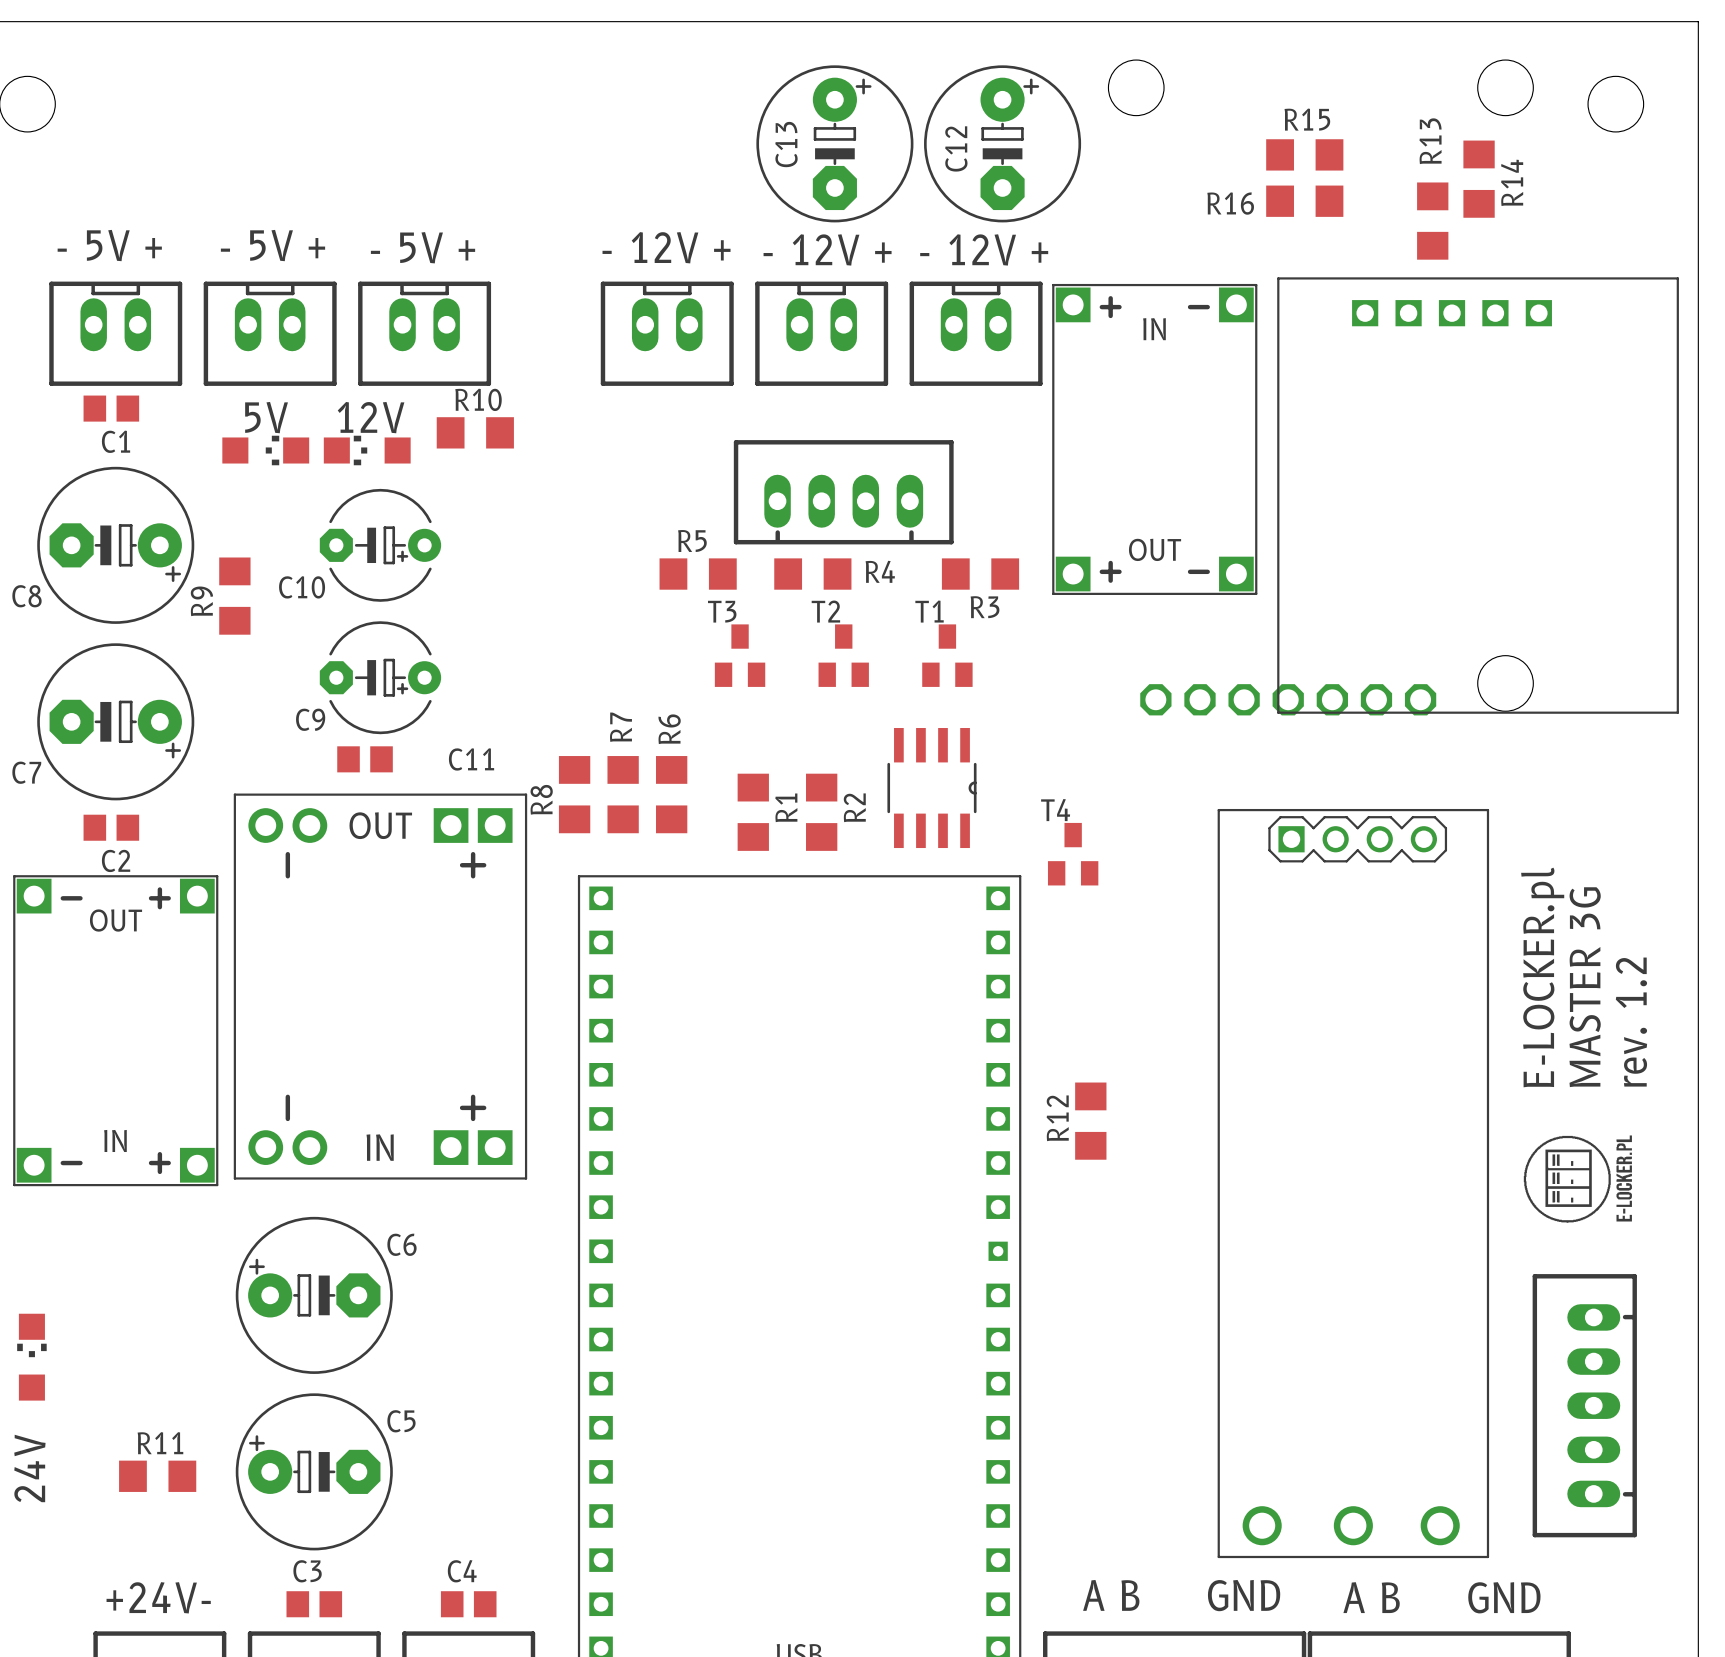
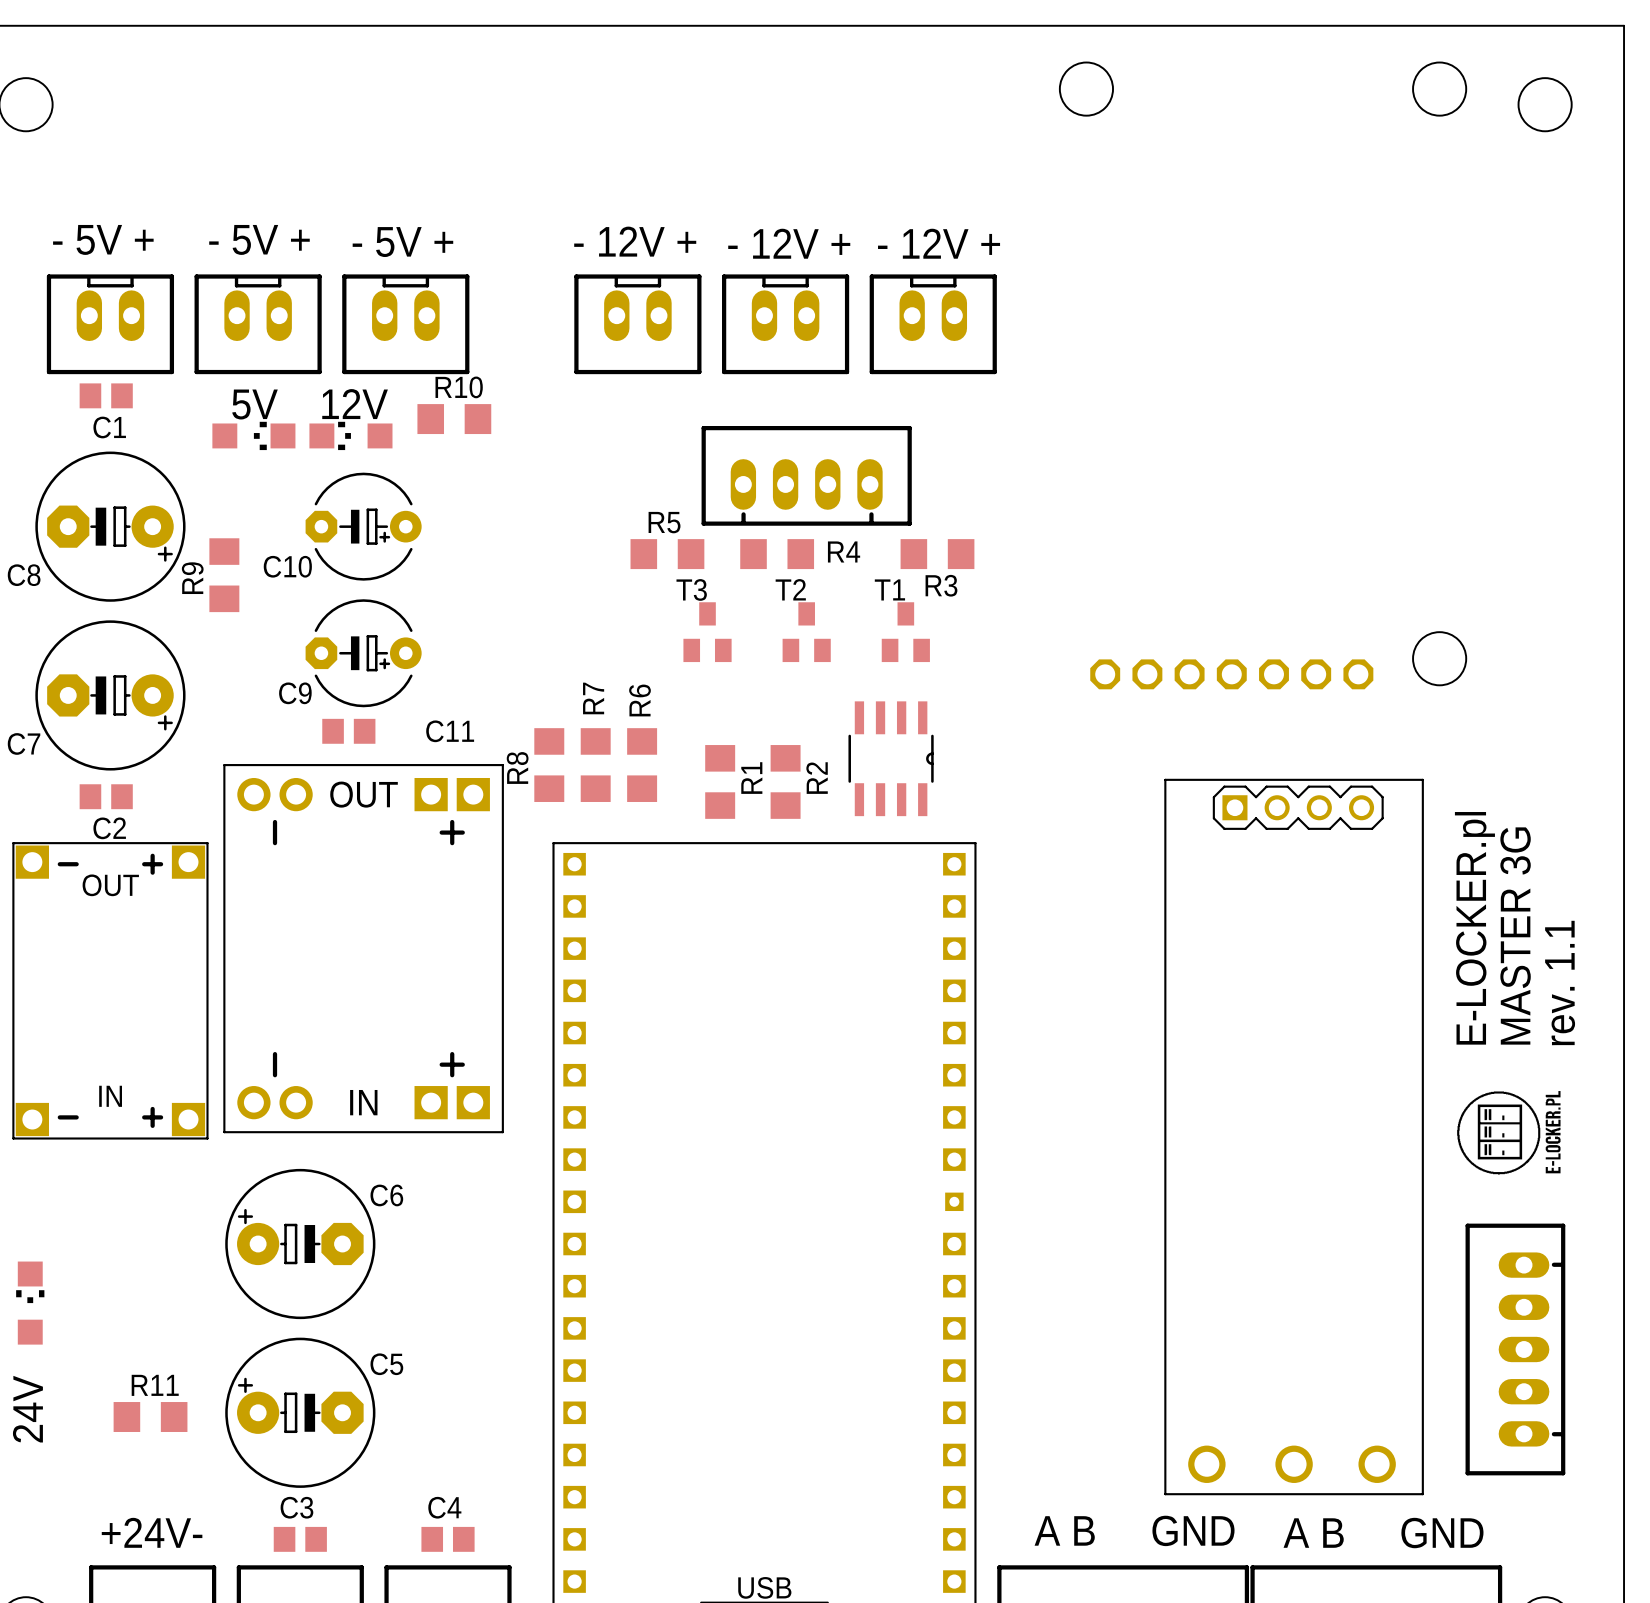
C13: (834, 143) -> none
C12: (1002, 143) -> none
R15: (1304, 154) -> none
R14: (1479, 179) -> none
R16: (1304, 201) -> none
R13: (1432, 221) -> none
part: (1154, 439) -> none
part: (1478, 495) -> none
T4: (1073, 854) -> none
text: rev. 1.2 (1631, 1022) -> rev. 1.1 (1560, 983)
R12: (1090, 1121) -> none

